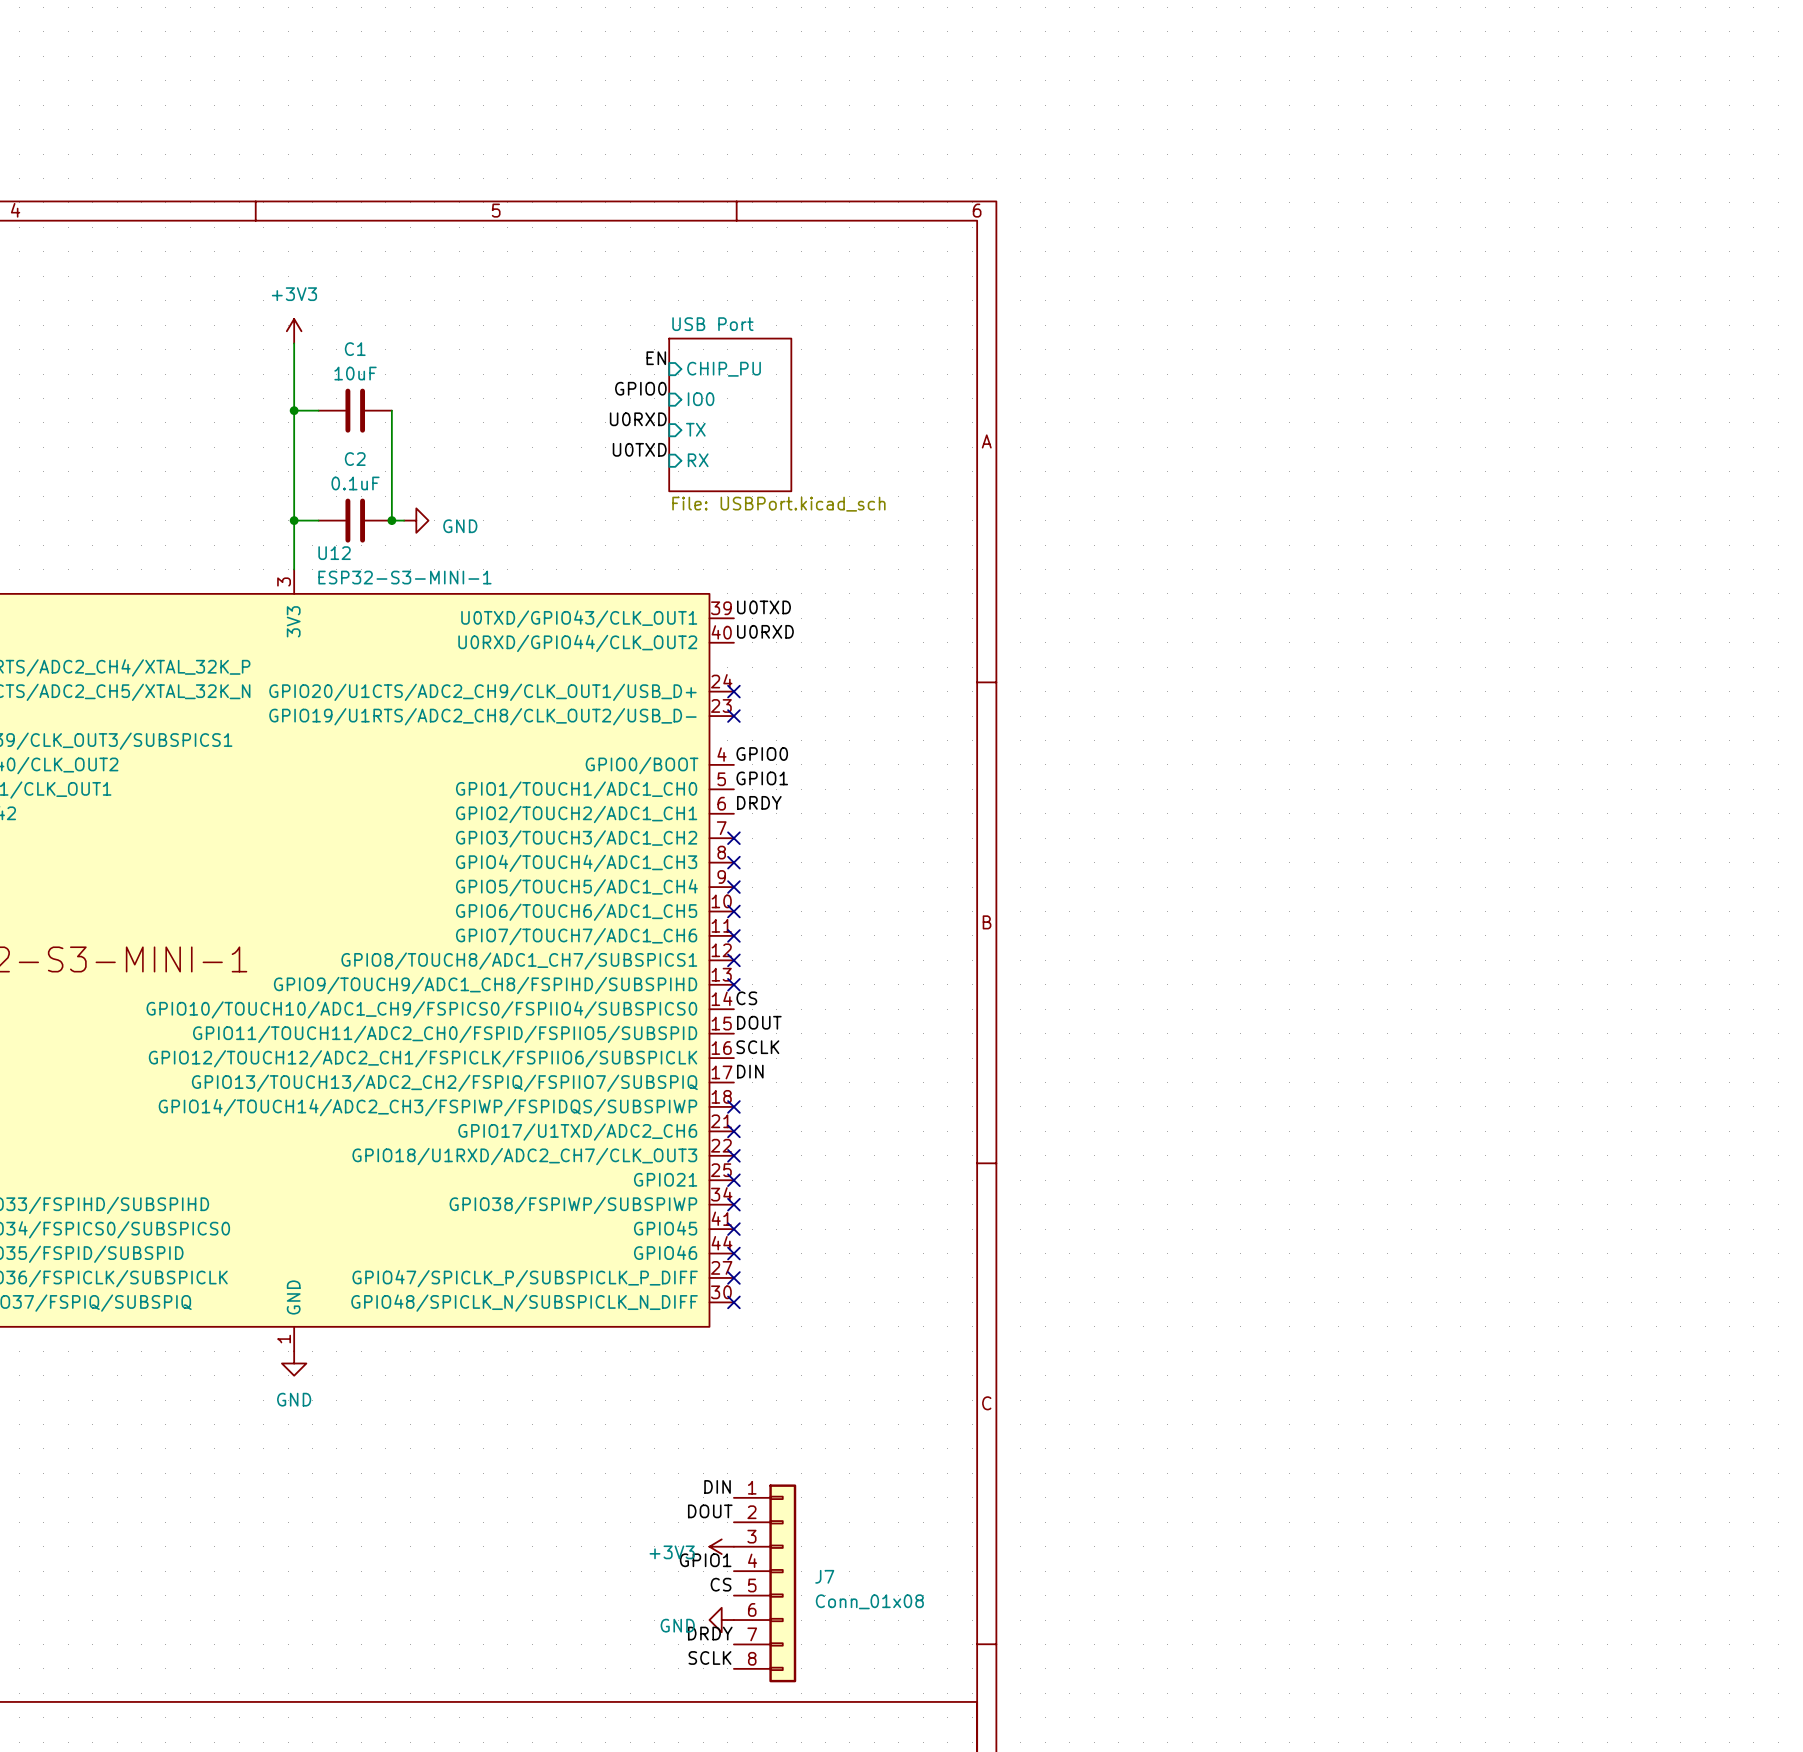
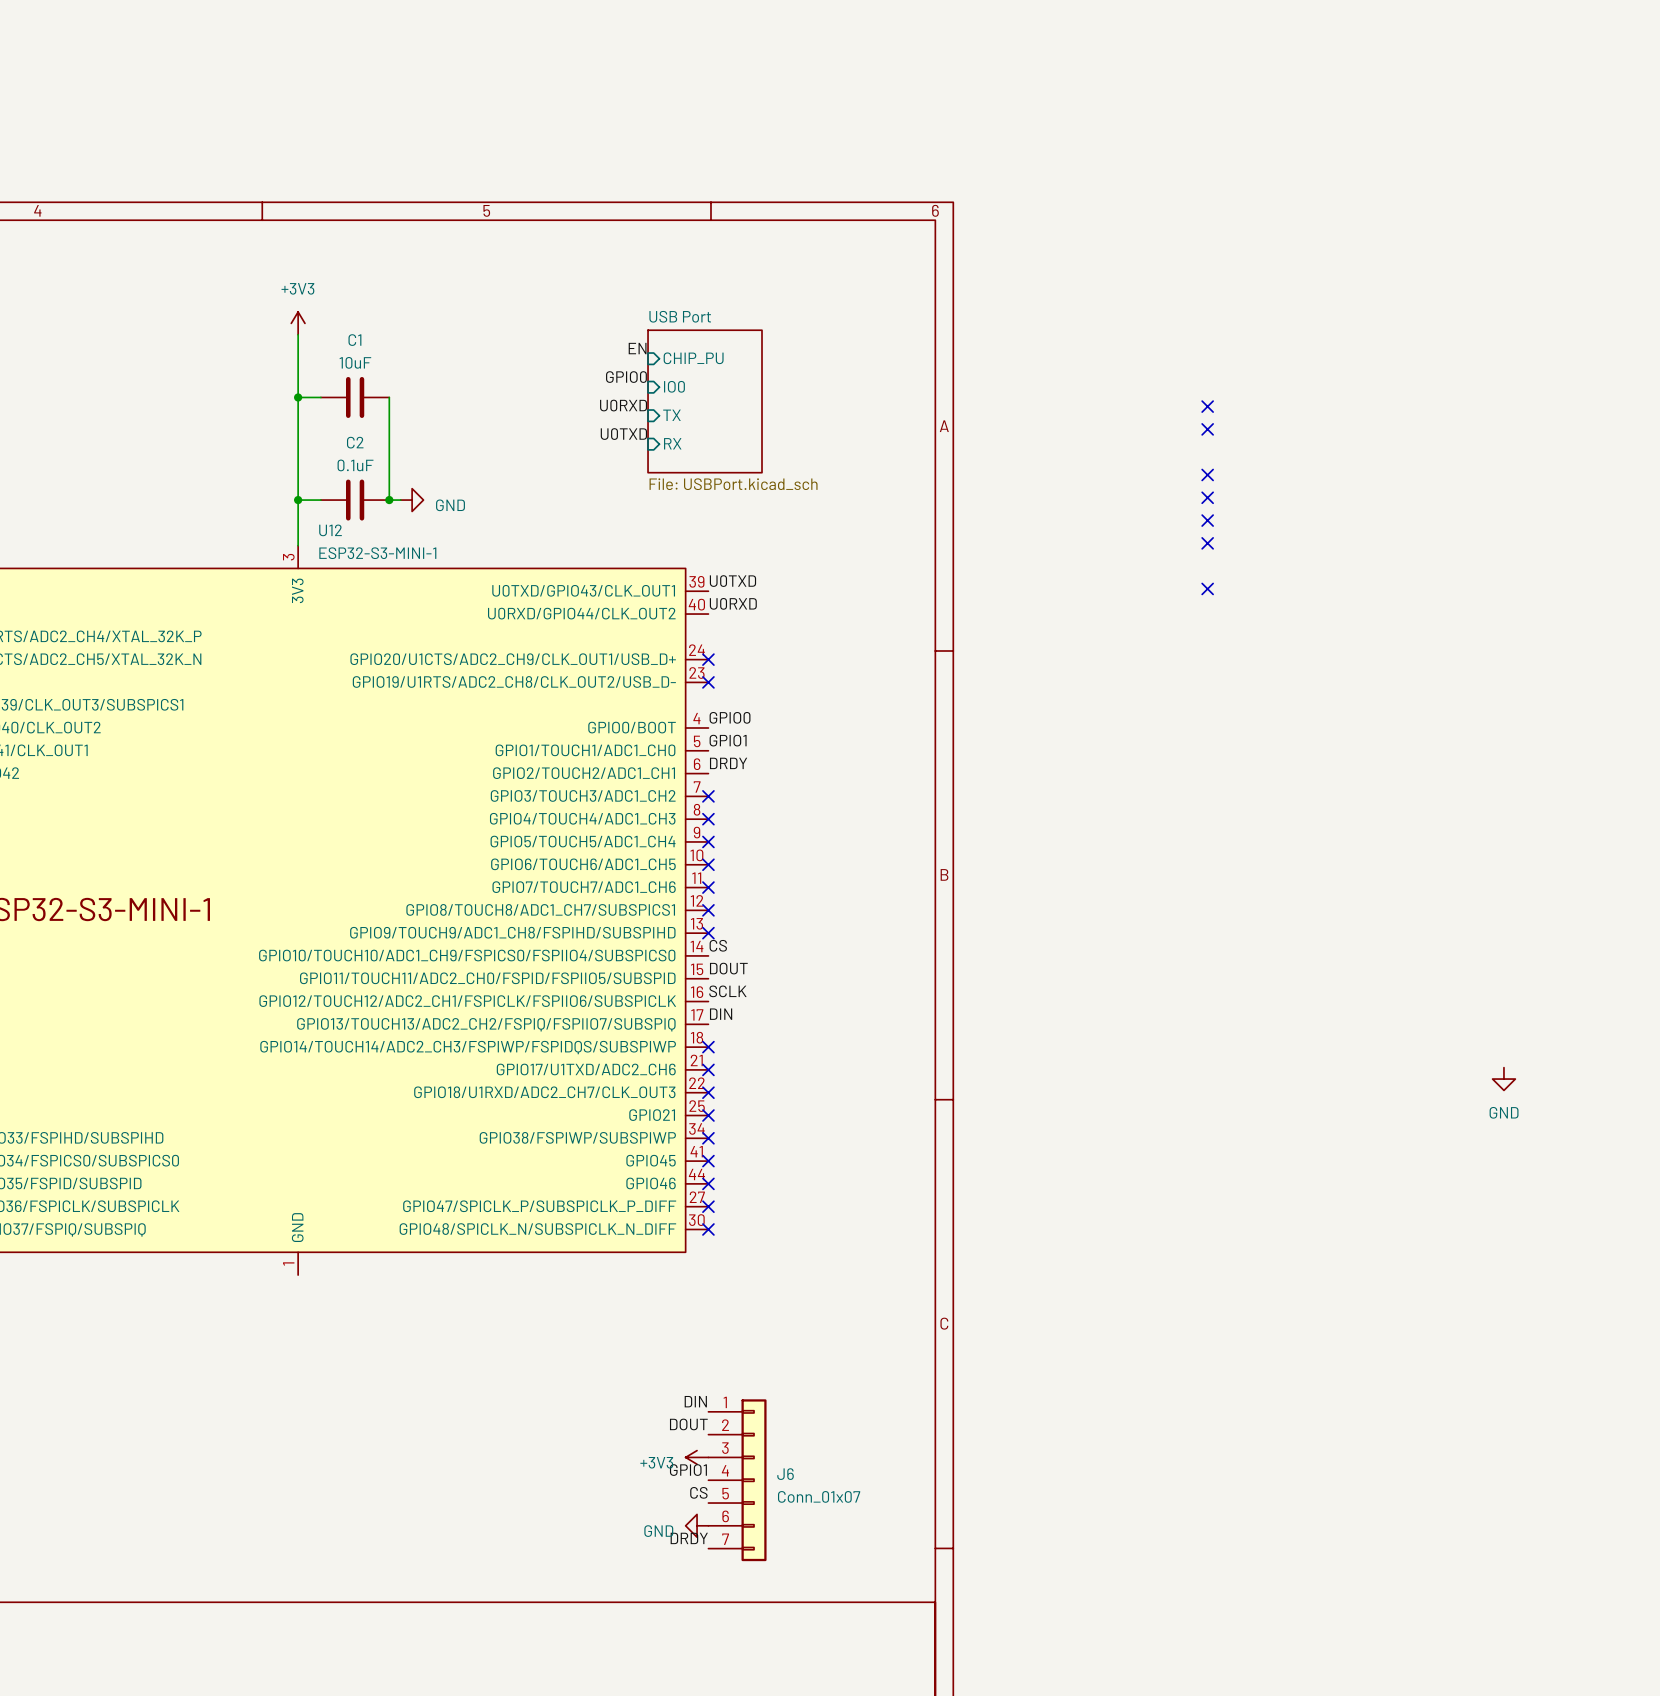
no-connect mark: none -> (1207, 406)
no-connect mark: none -> (1207, 429)
no-connect mark: none -> (1207, 474)
no-connect mark: none -> (1207, 497)
no-connect mark: none -> (1207, 520)
no-connect mark: none -> (1207, 543)
no-connect mark: none -> (1207, 588)
power symbol: none -> GND (1503, 1079)
power symbol: GND (294, 1363) -> none
J6: none -> Conn_01x07 (737, 1480)
J7: Conn_01x08 (765, 1583) -> none
label: SCLK (709, 1657) -> none

